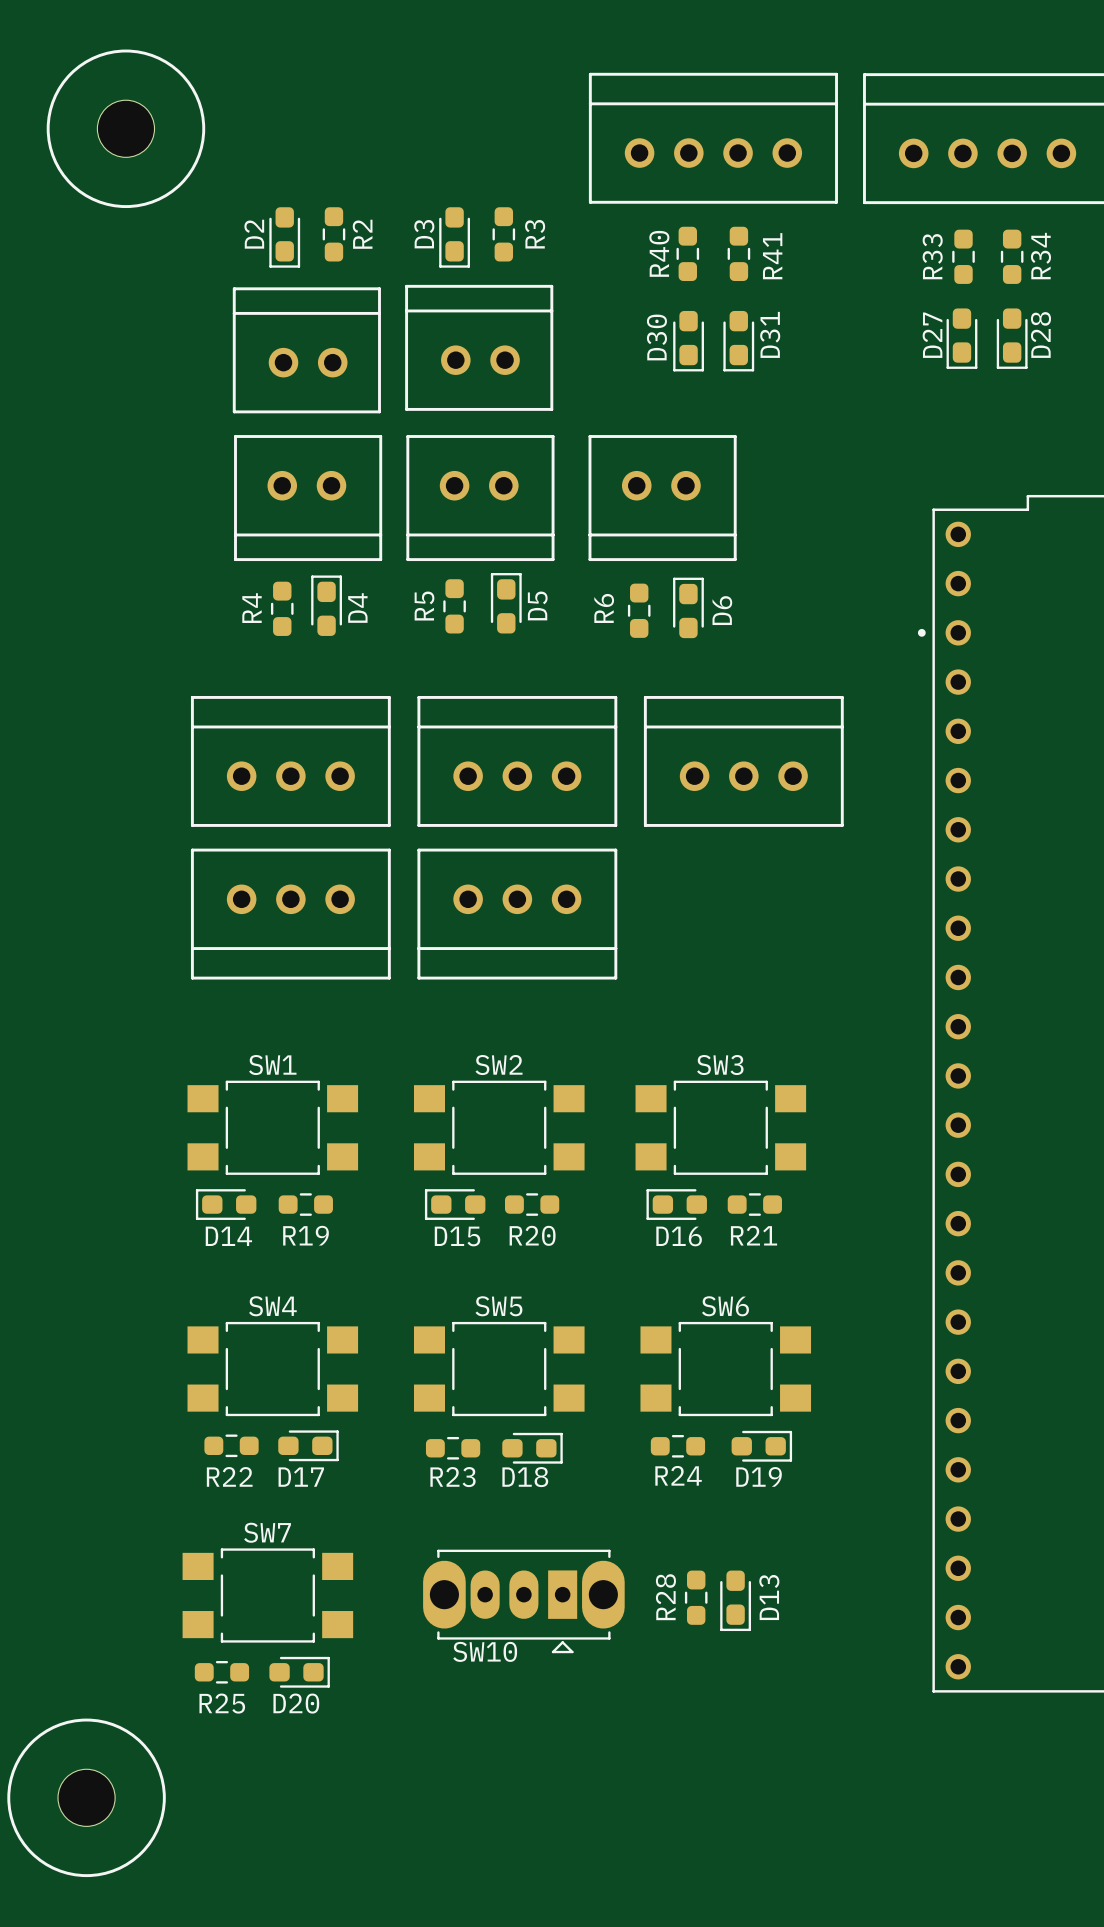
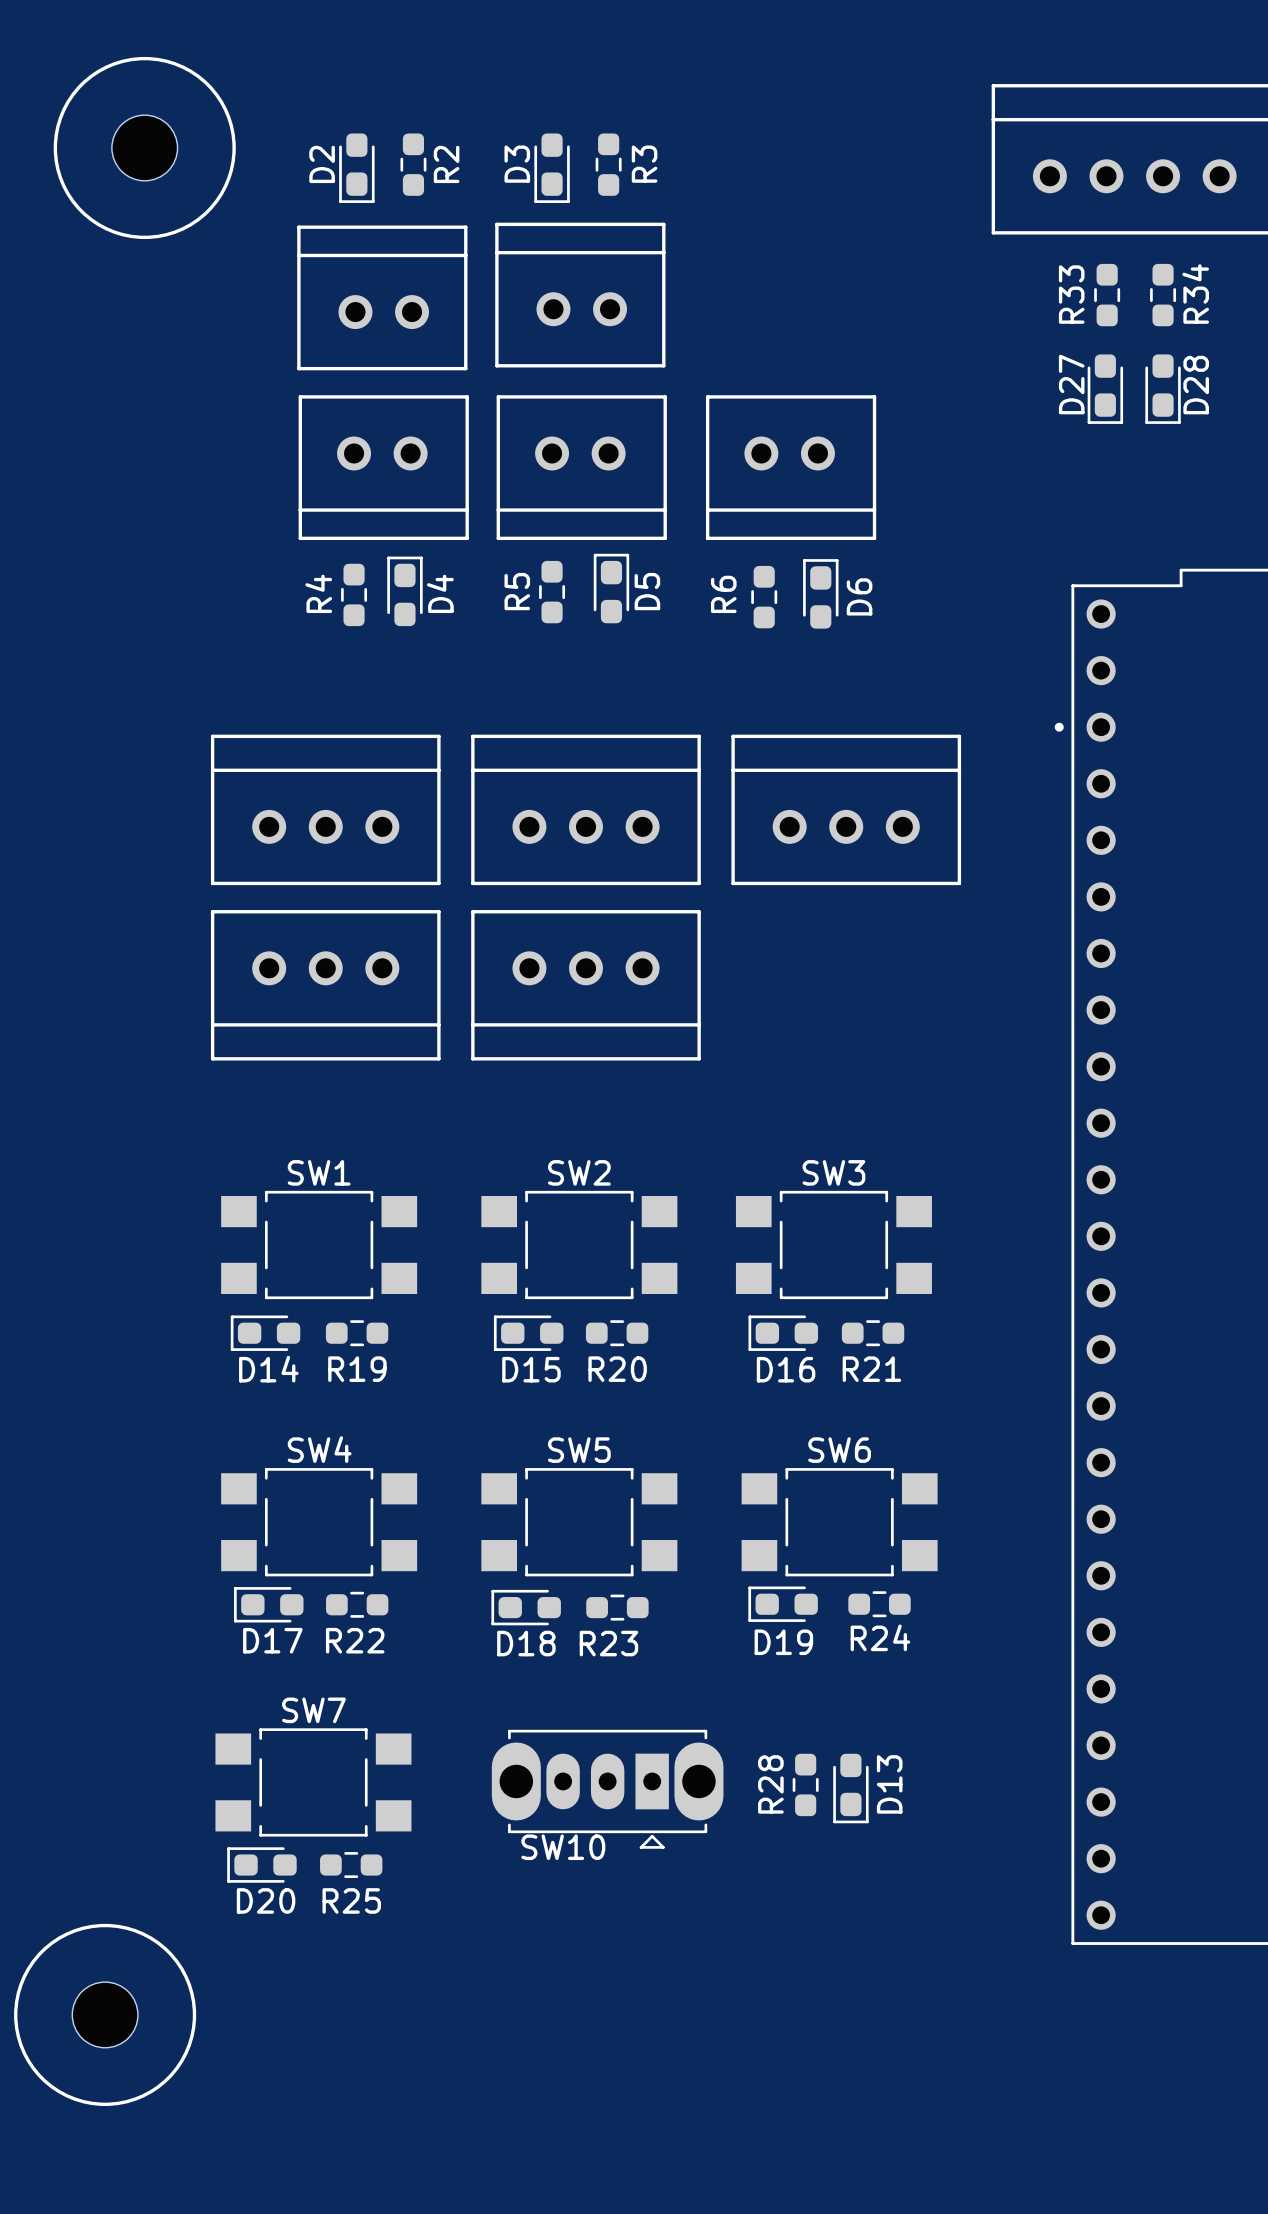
part: (713, 138) -> none
R2 position: (333, 234) -> (413, 164)
R3 position: (503, 234) -> (608, 164)
D2 position: (284, 237) -> (356, 168)
D3 position: (454, 237) -> (552, 168)
R40: (687, 253) -> none
R41: (738, 253) -> none
part: none -> (580, 295)
part: none -> (382, 297)
D30: (688, 341) -> none
D31: (738, 341) -> none
part: (479, 347) -> none
part: (306, 350) -> none
part: none -> (383, 467)
part: none -> (581, 467)
part: none -> (791, 467)
part: (308, 498) -> none
part: (480, 498) -> none
part: (662, 498) -> none
D5 position: (506, 603) -> (611, 588)
D4 position: (326, 605) -> (404, 591)
R5 position: (454, 606) -> (552, 592)
D6 position: (688, 607) -> (820, 593)
R4 position: (282, 608) -> (354, 594)
R6 position: (639, 610) -> (764, 597)
part: none -> (325, 809)
part: none -> (586, 809)
part: (290, 761) -> none
part: (517, 761) -> none
part position: (743, 761) -> (846, 809)
part: none -> (325, 985)
part: none -> (586, 985)
part: (290, 914) -> none
part: (517, 914) -> none
SW1 position: (272, 1127) -> (319, 1244)
SW2 position: (499, 1127) -> (579, 1244)
SW3 position: (720, 1127) -> (833, 1244)
D14 position: (226, 1204) -> (265, 1333)
R19 position: (305, 1204) -> (357, 1333)
D15 position: (455, 1204) -> (528, 1333)
R20 position: (532, 1204) -> (617, 1333)
D16 position: (676, 1204) -> (783, 1333)
R21 position: (754, 1204) -> (873, 1333)
SW4 position: (272, 1369) -> (319, 1522)
SW5 position: (499, 1369) -> (579, 1522)
SW6 position: (725, 1369) -> (839, 1522)
R22 position: (231, 1445) -> (357, 1604)
D17 rotation: 0° (308, 1445) -> 180° (268, 1604)
D17 position: (308, 1445) -> (268, 1604)
R24 position: (677, 1446) -> (879, 1604)
D19 rotation: 0° (761, 1446) -> 180° (783, 1604)
D19 position: (761, 1446) -> (783, 1604)
R23 position: (453, 1448) -> (617, 1607)
D18 rotation: 0° (532, 1448) -> 180° (526, 1607)
D18 position: (532, 1448) -> (526, 1607)
R23 name position: R23 (453, 1477) -> R23 (608, 1643)
SW7 position: (267, 1595) -> (313, 1782)
R28 position: (696, 1597) -> (805, 1784)
D13 position: (735, 1600) -> (850, 1788)
SW10 position: (523, 1601) -> (607, 1789)
R25 position: (221, 1672) -> (351, 1865)
D20 rotation: 0° (299, 1672) -> 180° (261, 1865)
D20 position: (299, 1672) -> (261, 1865)
part position: (86, 1797) -> (105, 2014)

